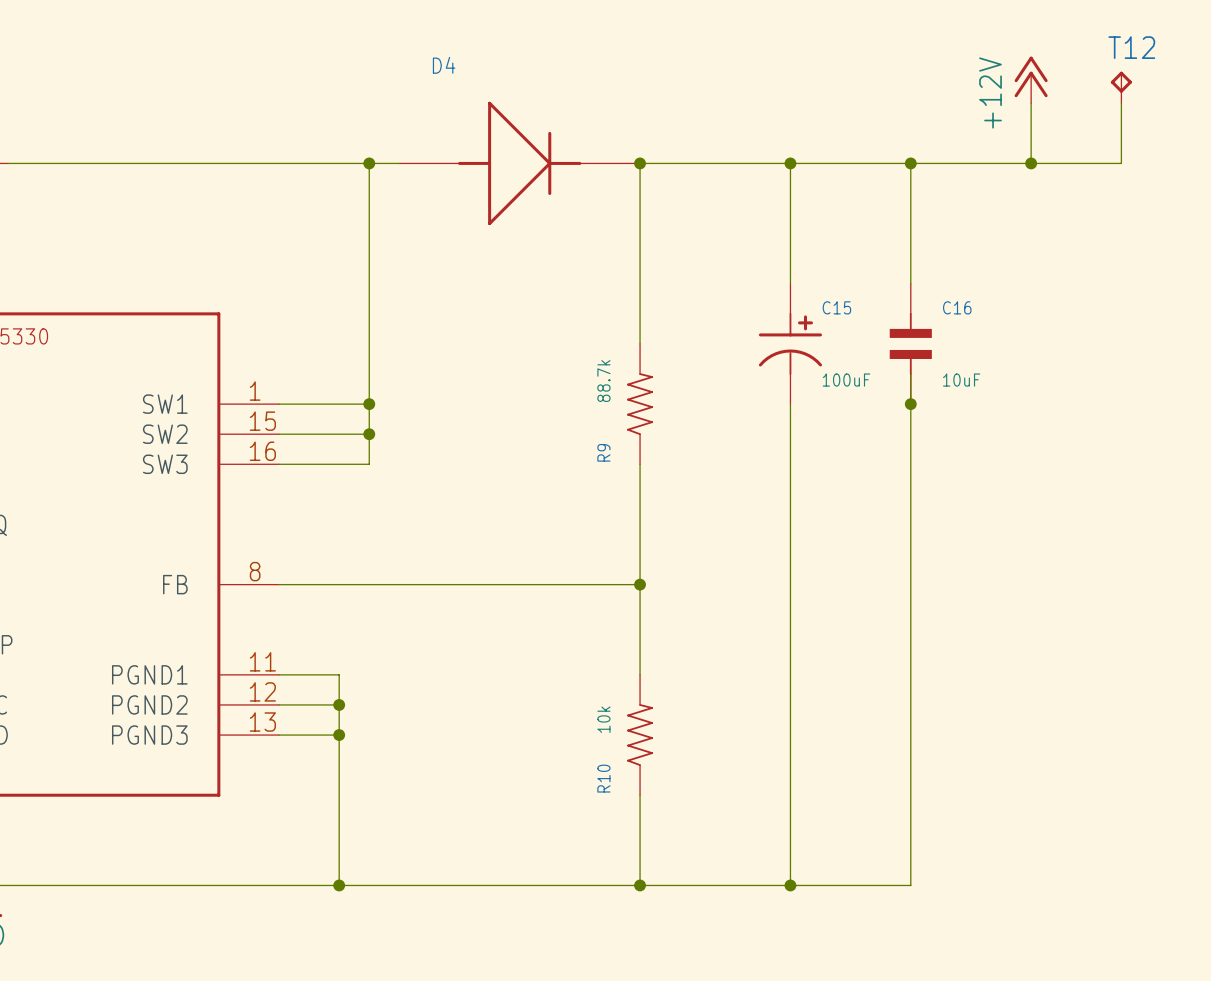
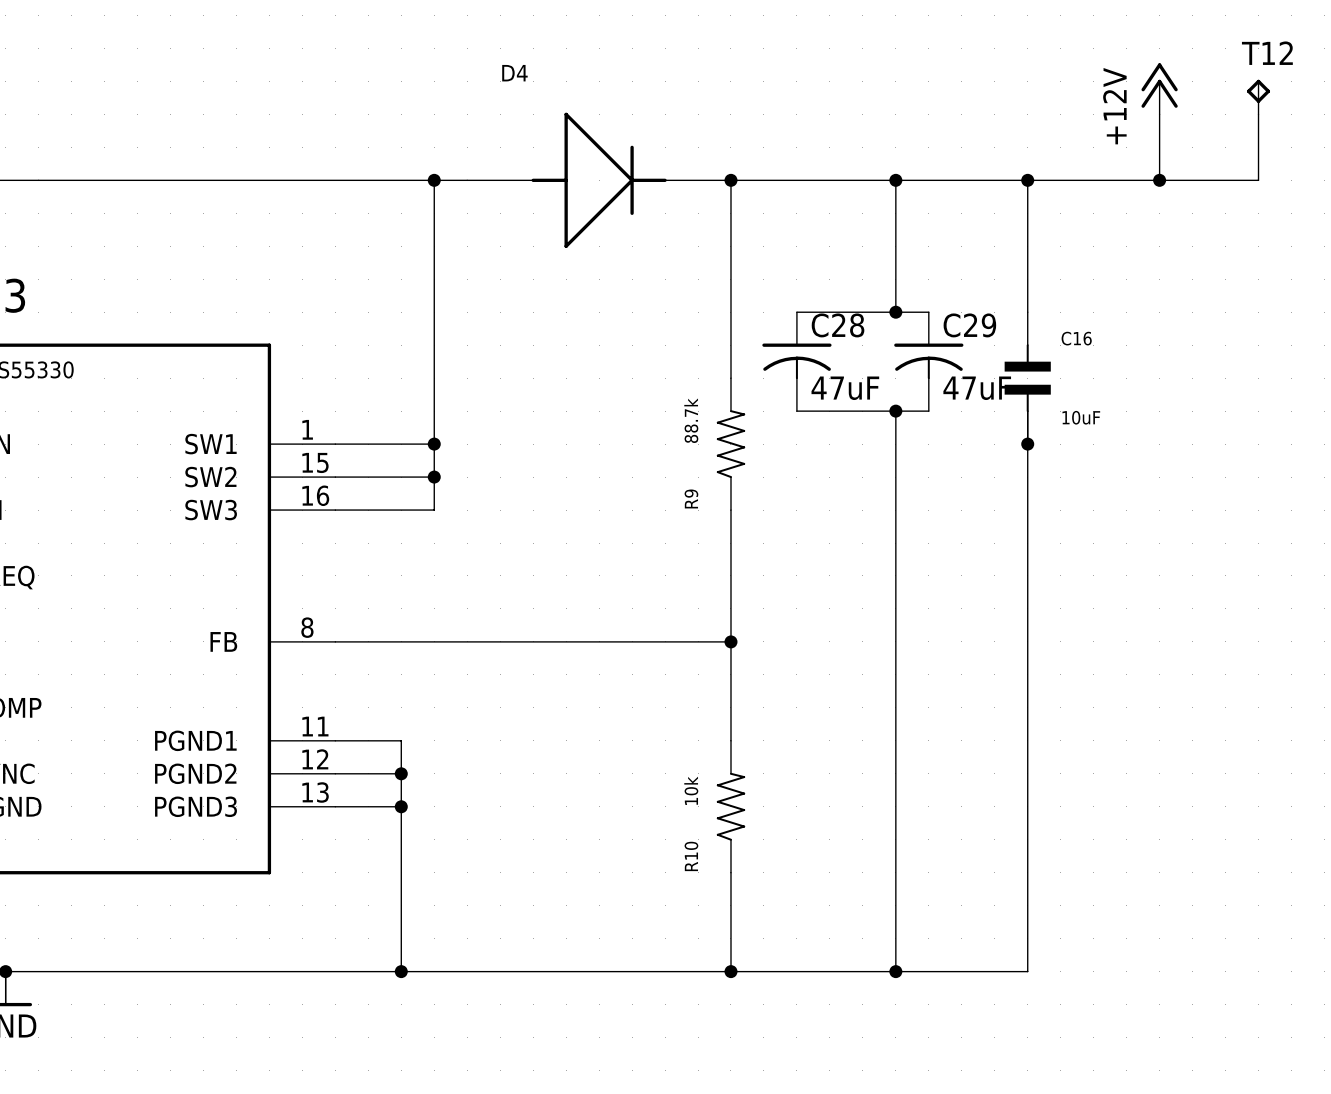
wire: none -> (796, 312) (928, 312)
junction: none -> (895, 312)
C28: none -> 47uF (796, 361)
C29: none -> 47uF (928, 361)
C15: 100uF (790, 343) -> none
wire: none -> (796, 411) (928, 411)
junction: none -> (895, 411)

